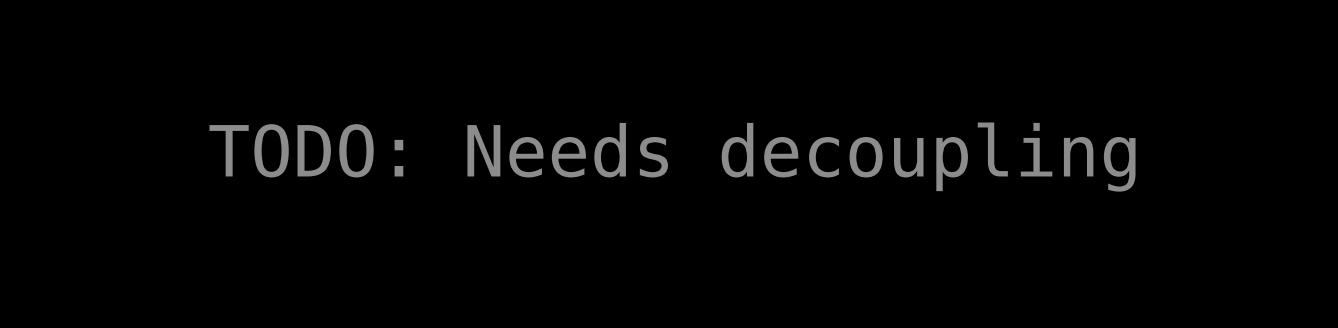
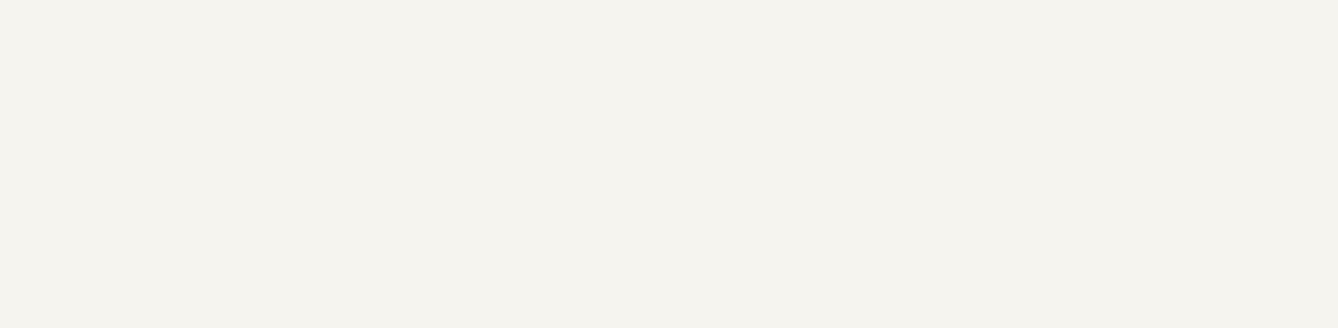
text: TODO: Needs decoupling (672, 157) -> none

